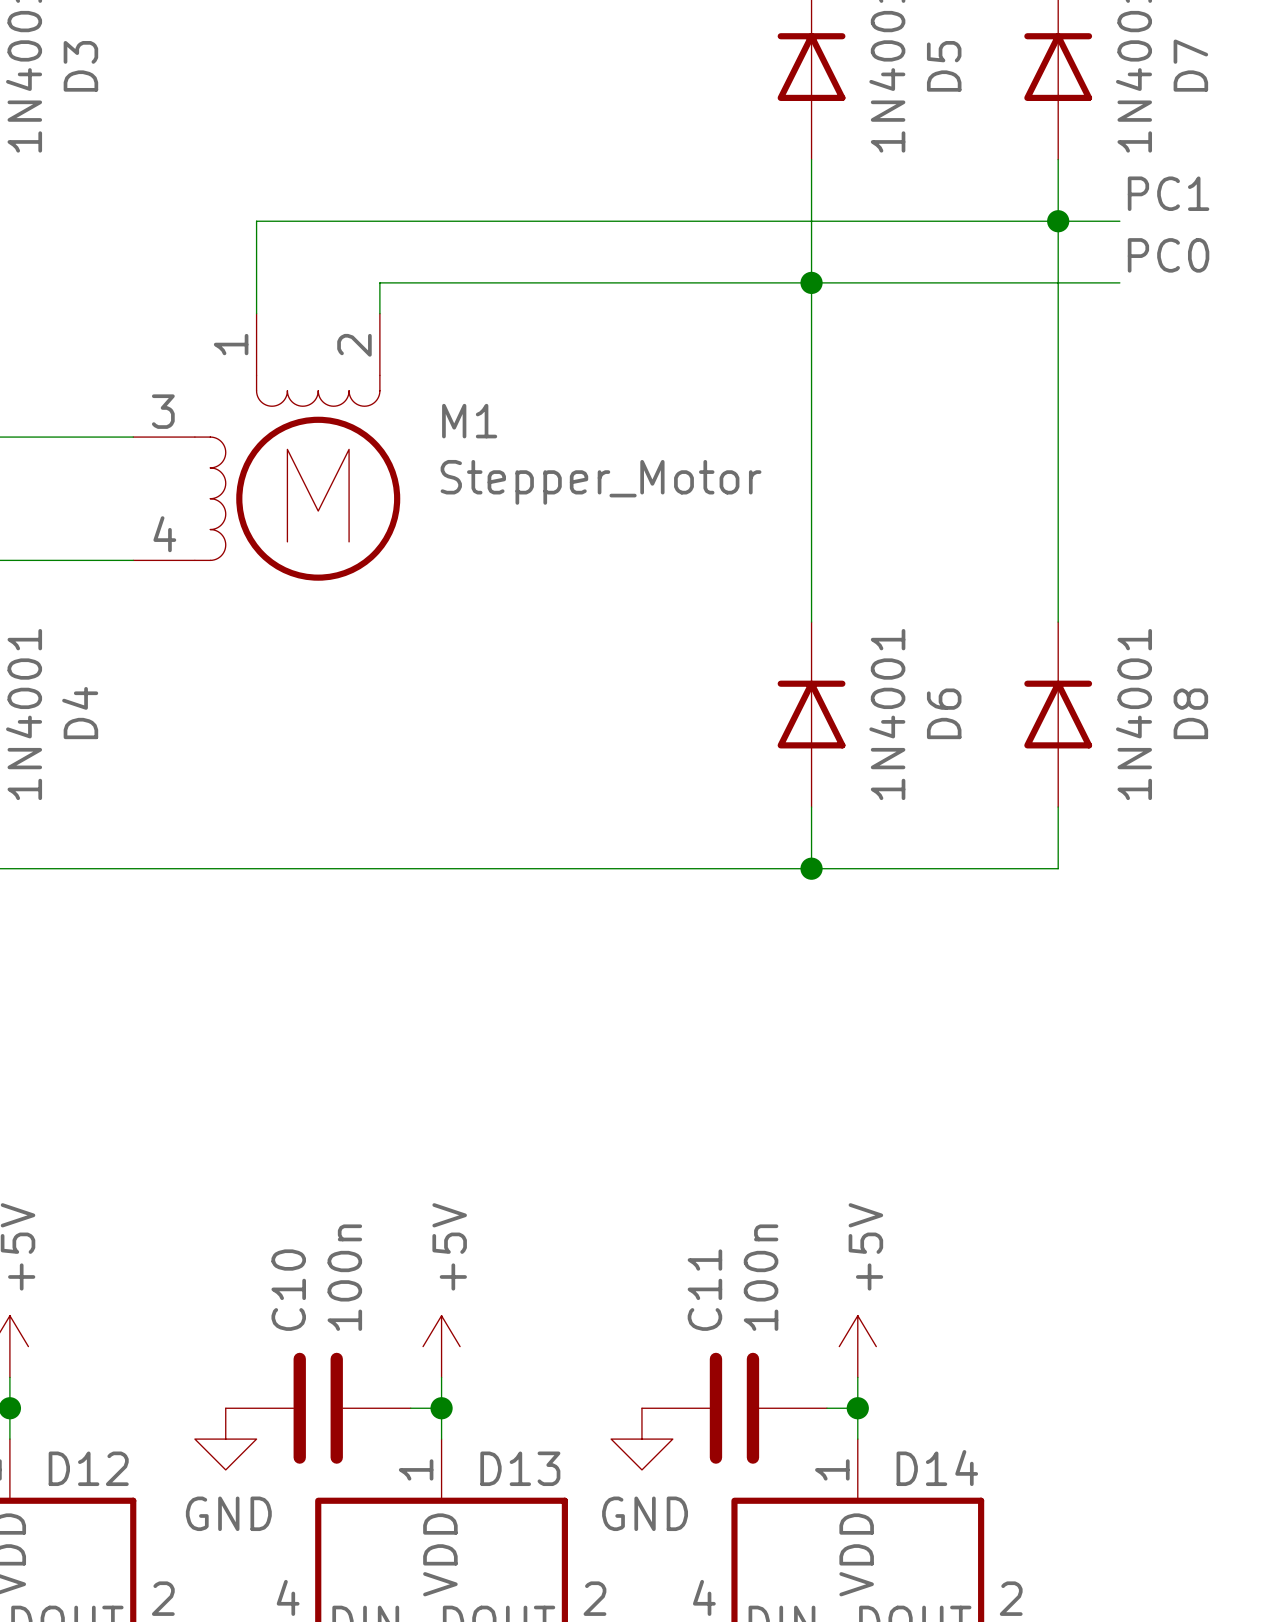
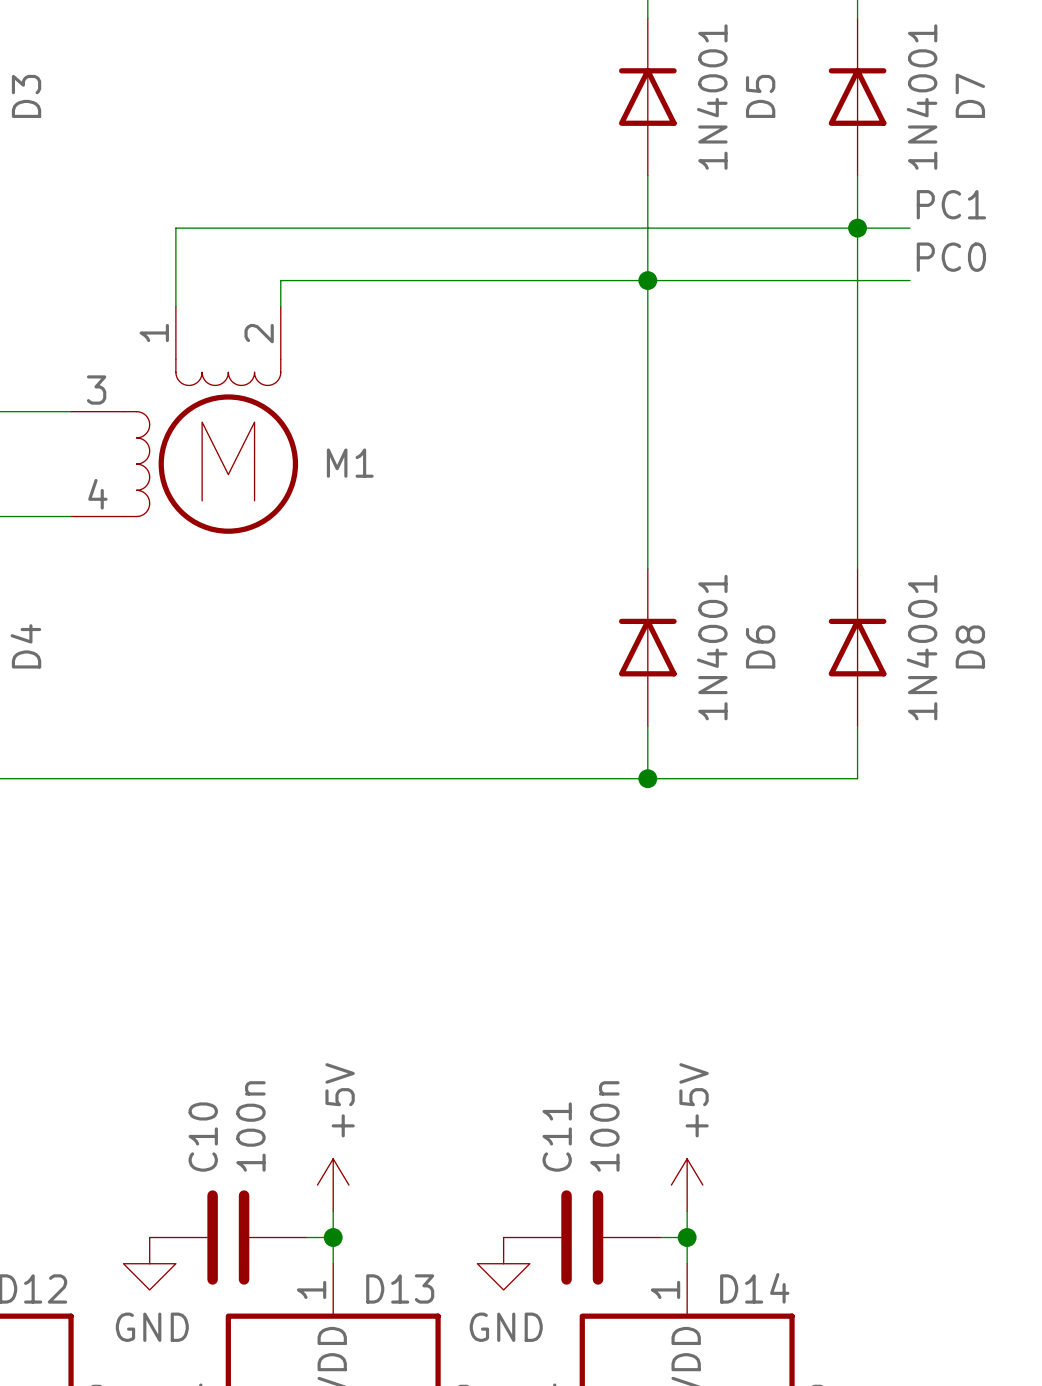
M1 name position: M1 (469, 421) -> M1 (350, 463)
M1 value: Stepper_Motor (601, 482) -> none

